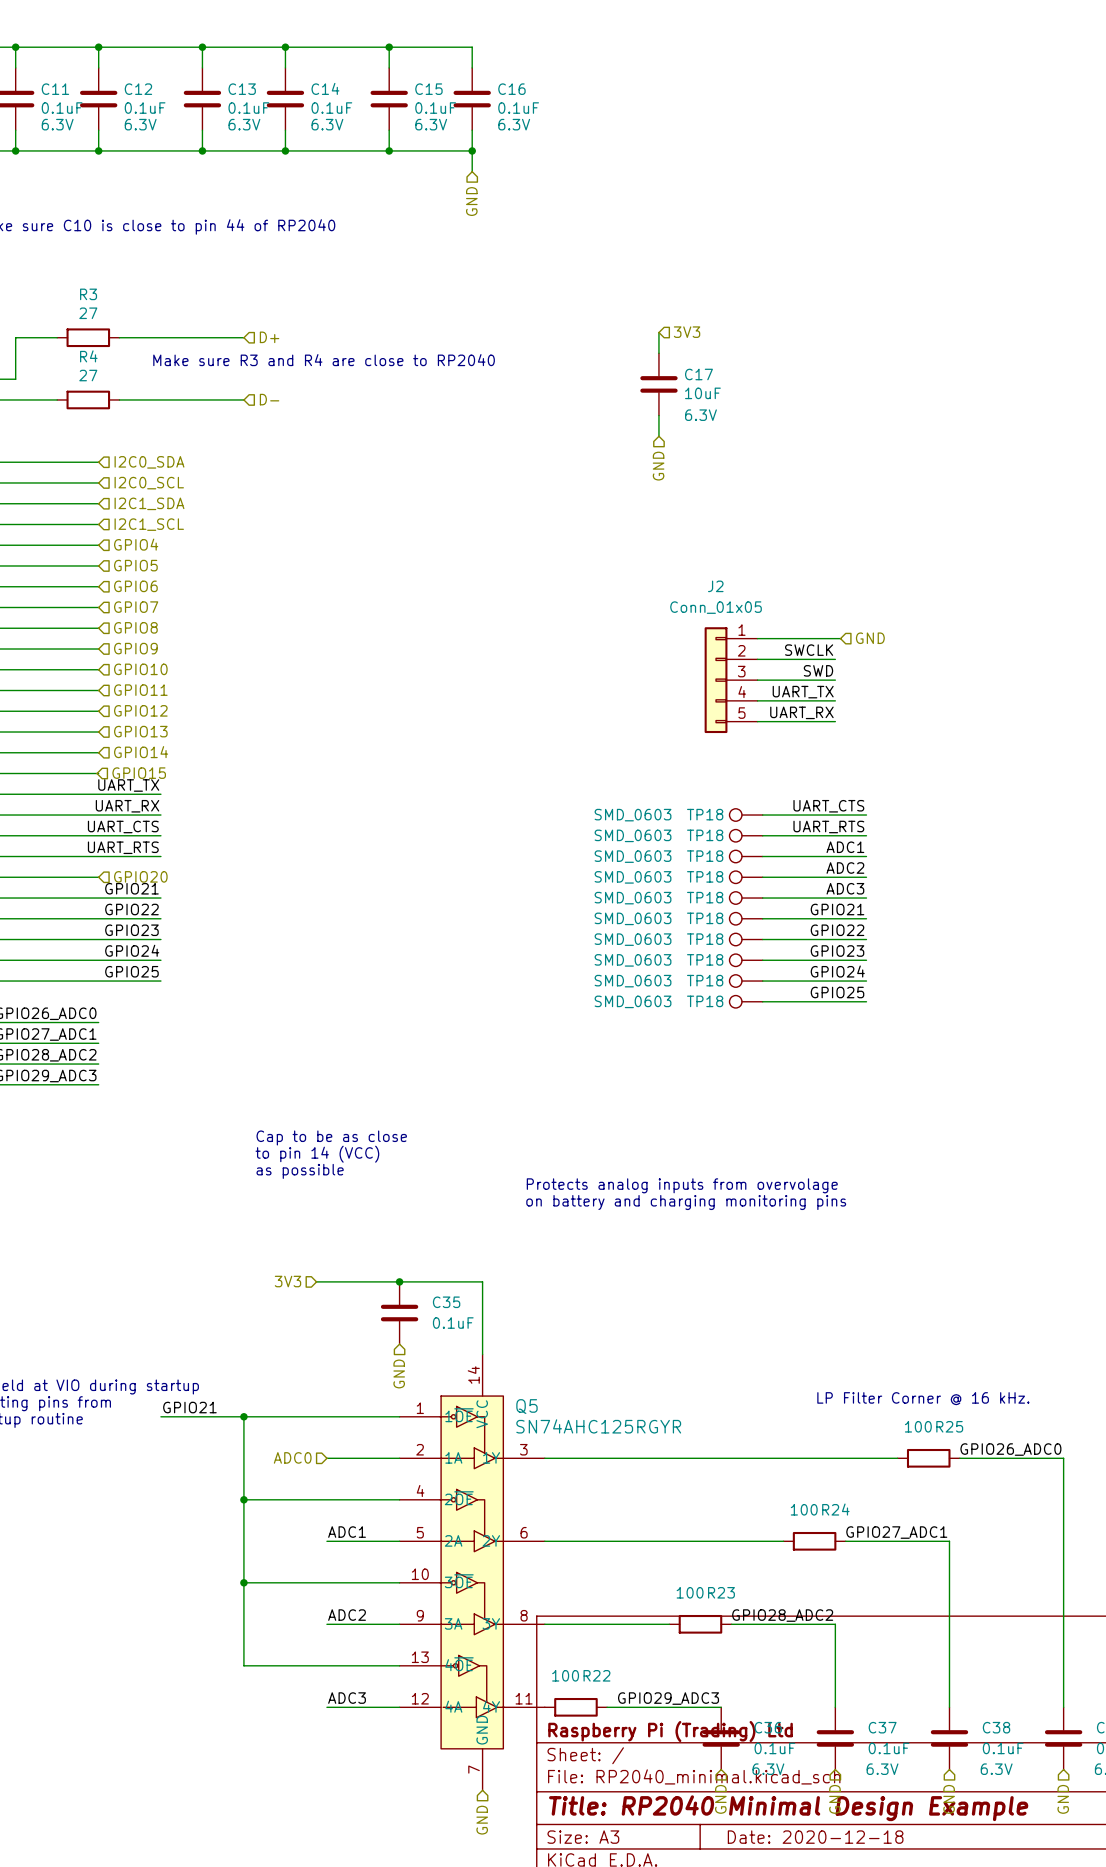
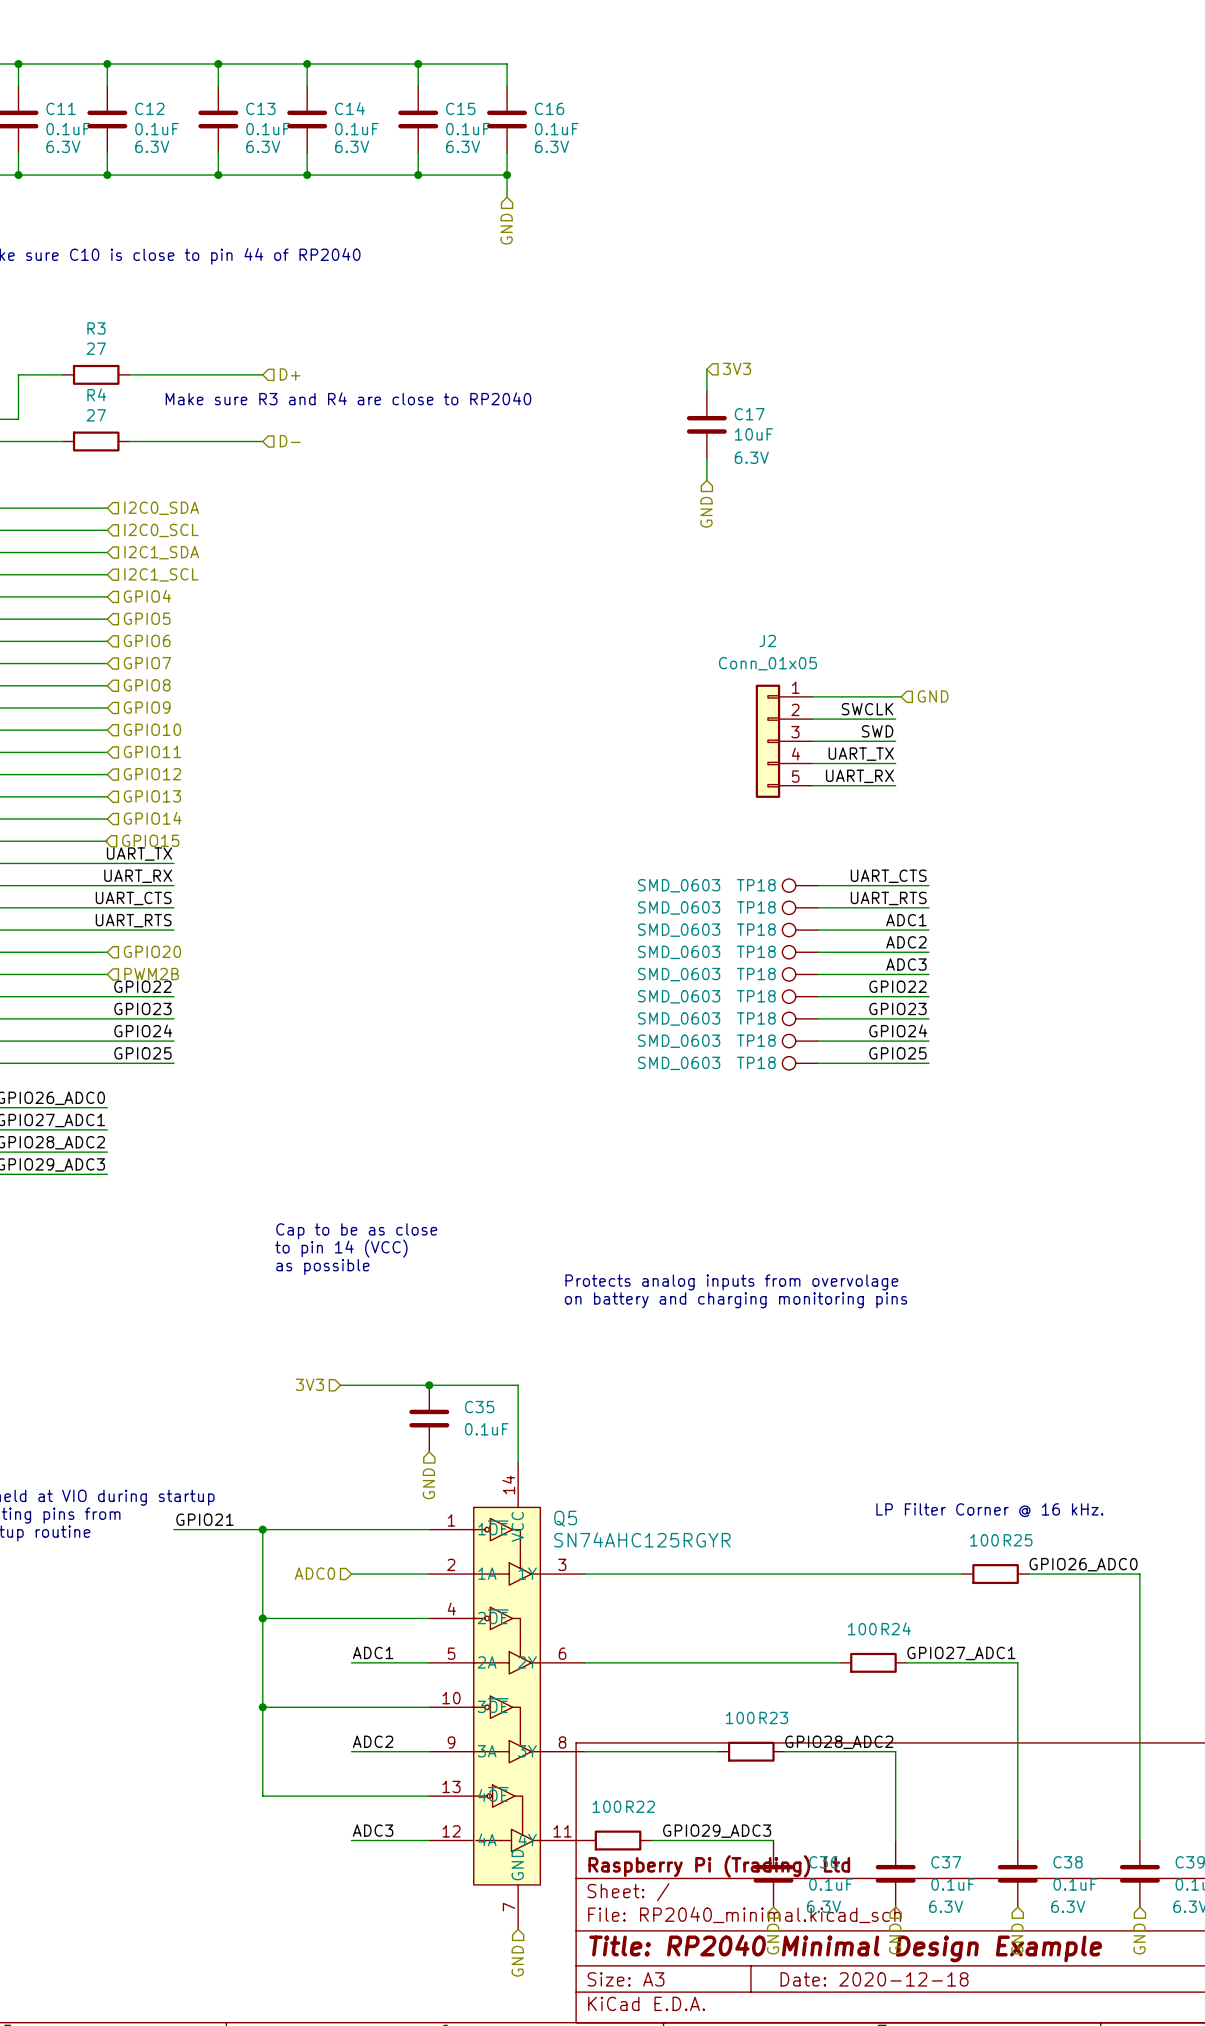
label: GPIO21 (131, 888) -> none
hierarchical label: none -> PWM2B (151, 974)
wire: (98, 898) (160, 898) -> none
label: GPIO21 (837, 909) -> GPIO22 (897, 986)
label: GPIO22 (837, 930) -> GPIO23 (897, 1008)
label: GPIO23 (837, 951) -> GPIO24 (898, 1030)
label: GPIO24 (837, 971) -> GPIO25 (897, 1053)
label: GPIO25 (837, 992) -> none
TP18: SMD_0603 (746, 1001) -> none
wire: (762, 1001) (866, 1001) -> none

